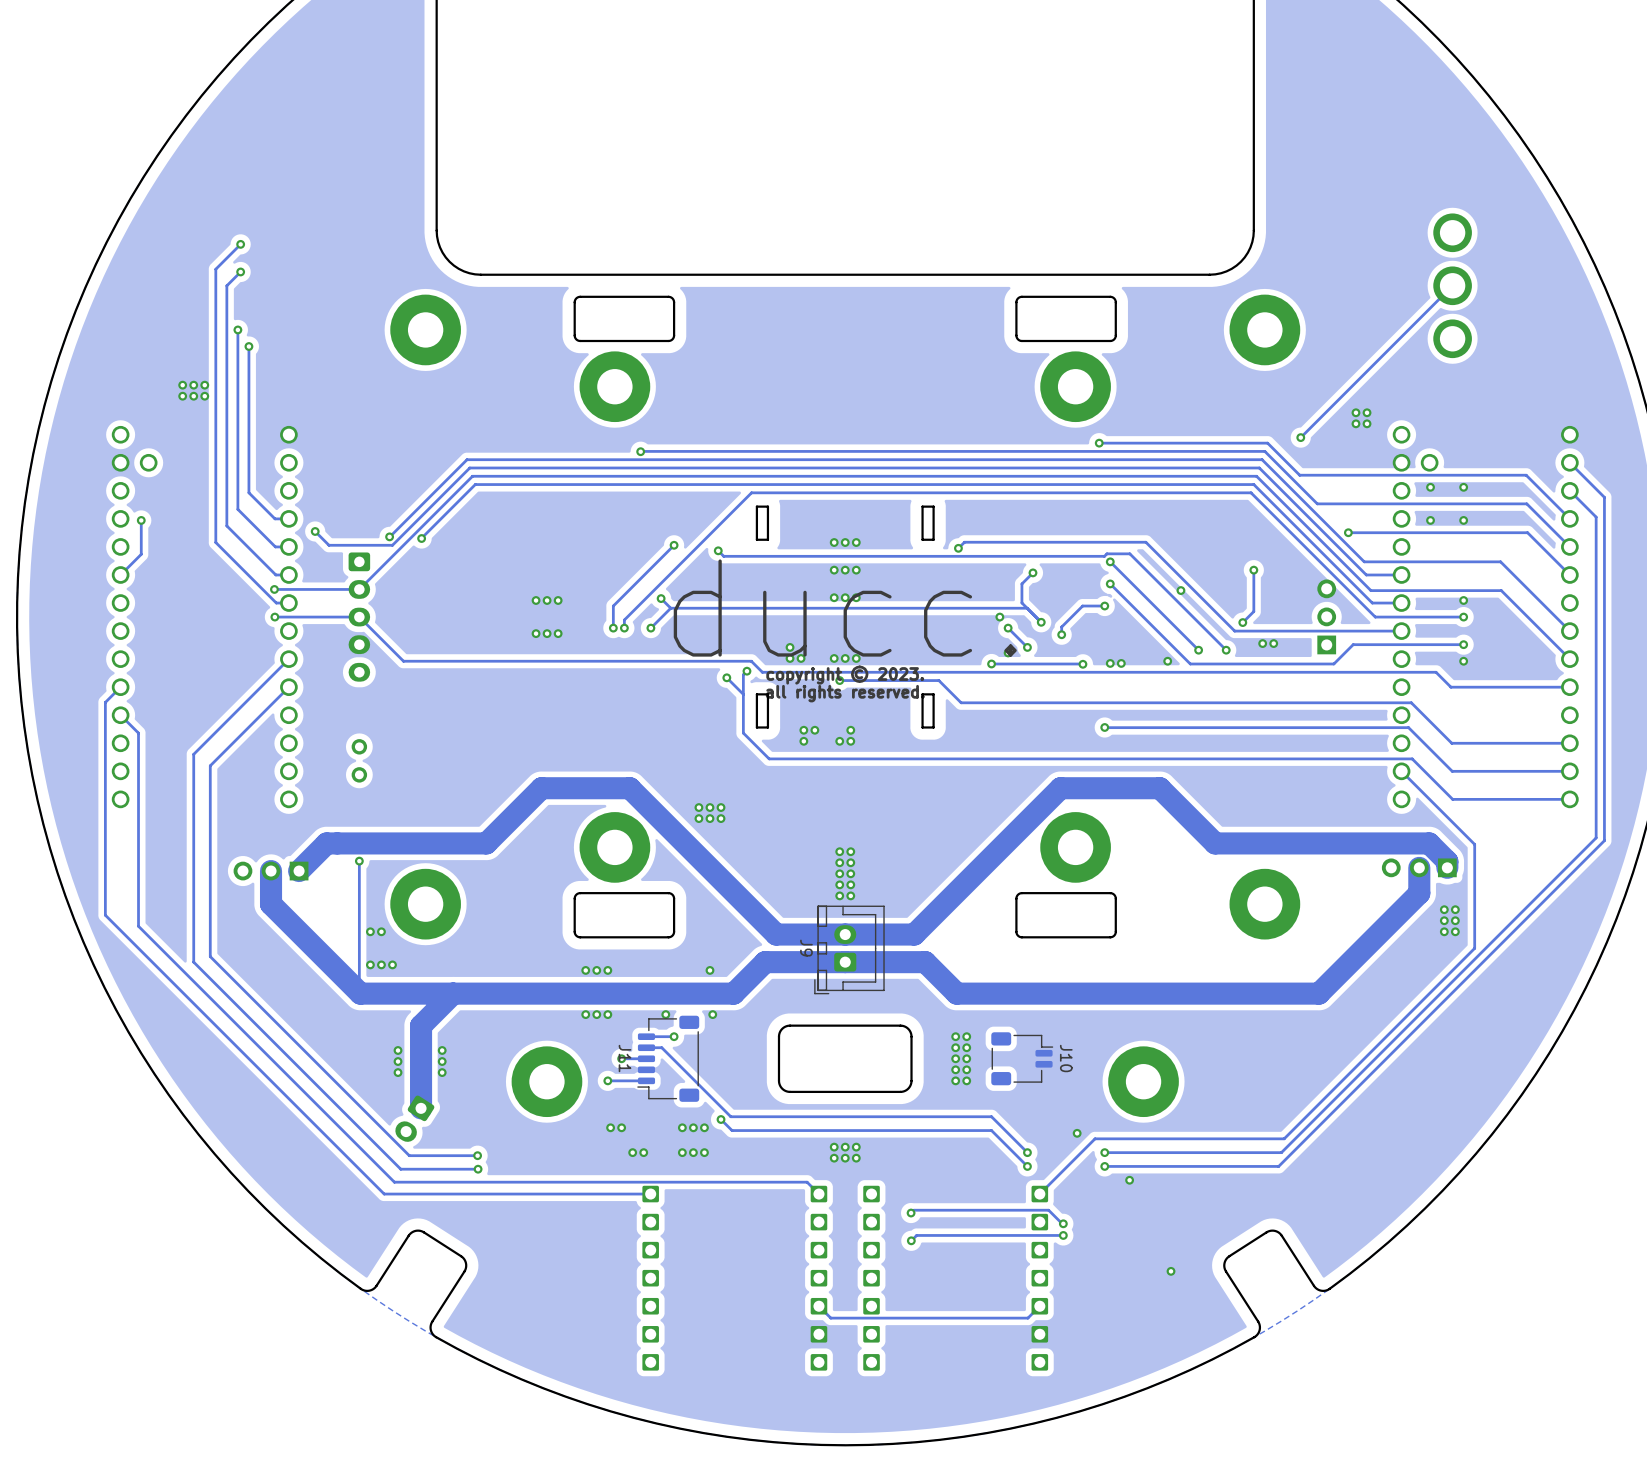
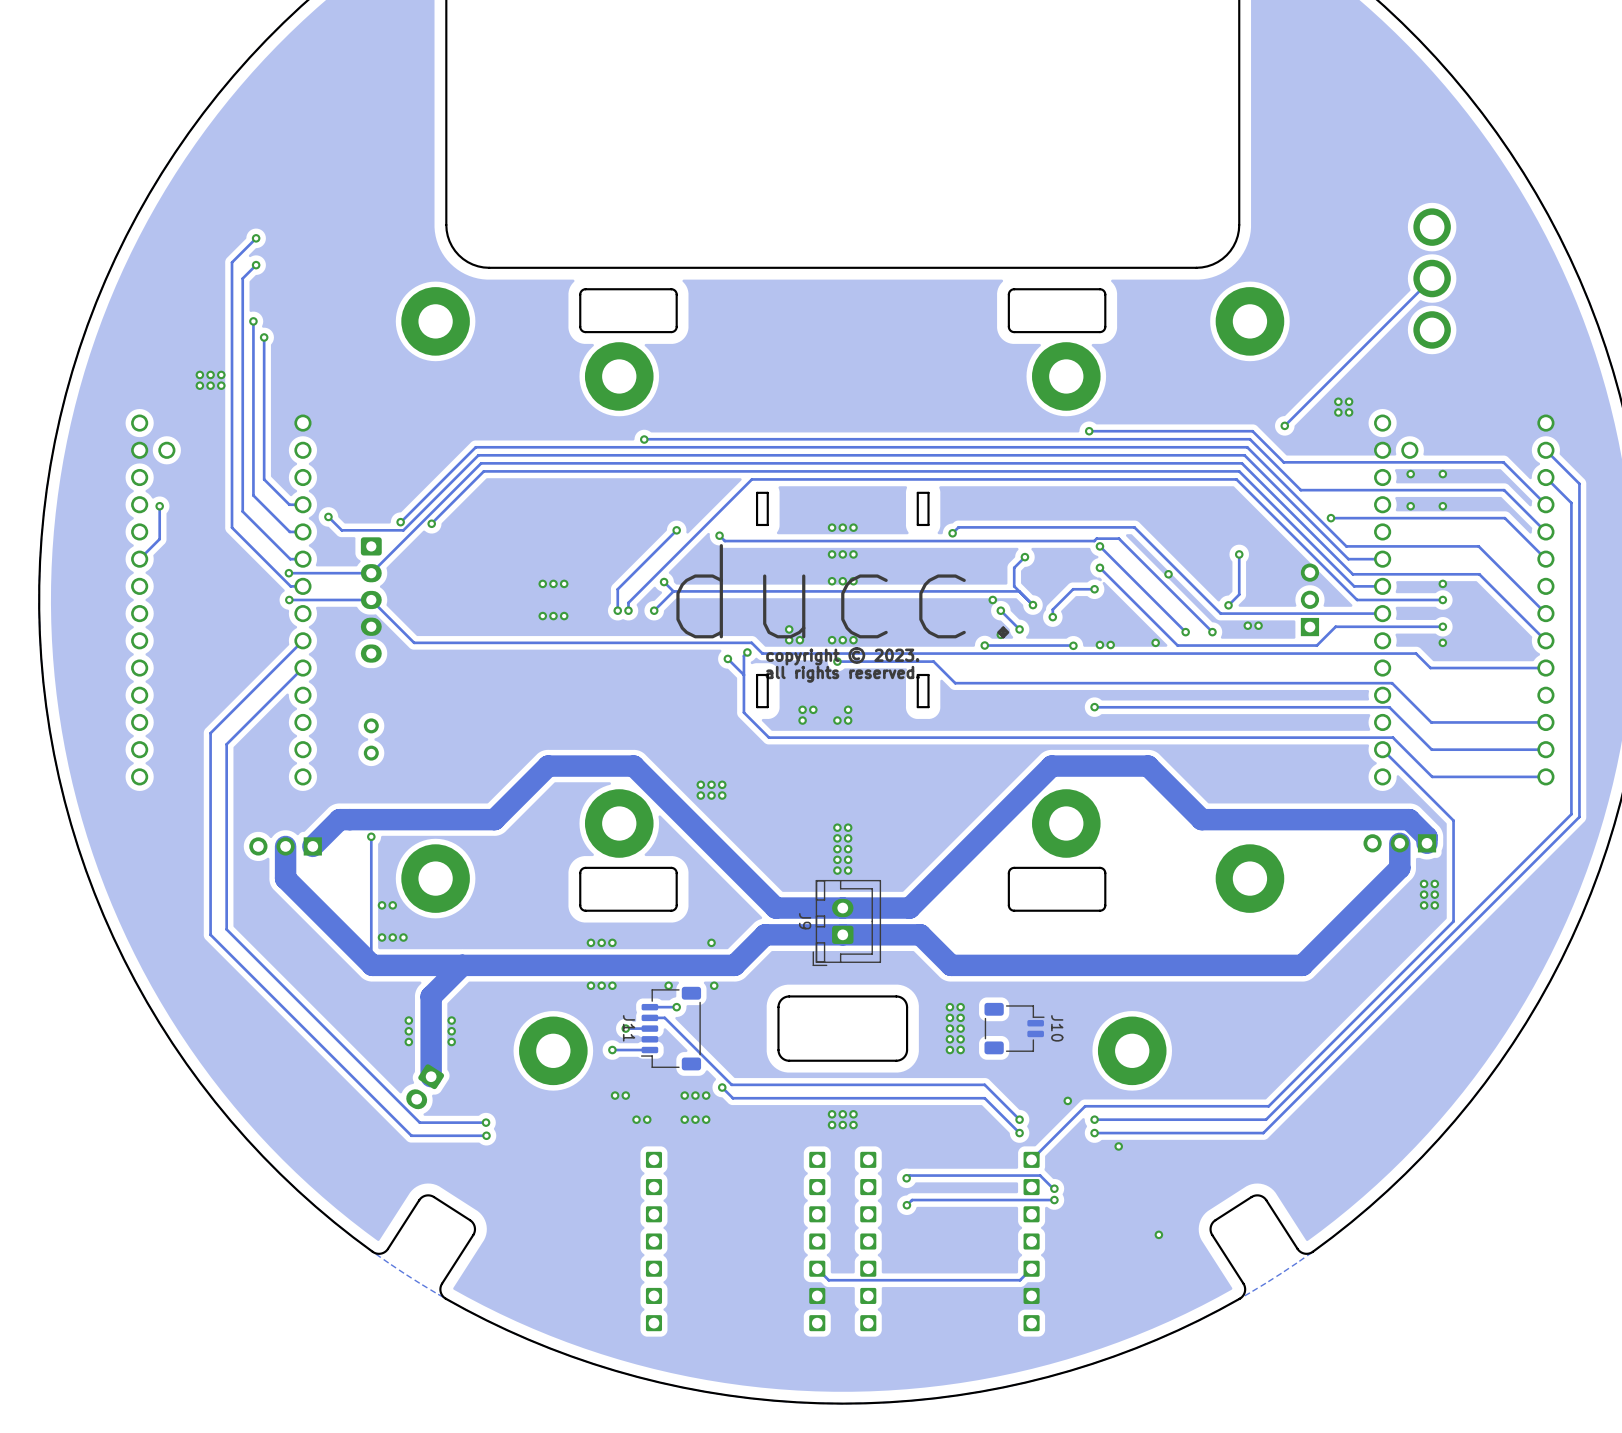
track: (120, 687) (105, 702) (105, 915) (384, 1194) (650, 1194) -> none
track: (120, 715) (138, 733) (138, 926) (394, 1182) (807, 1182) (818, 1194) -> none

